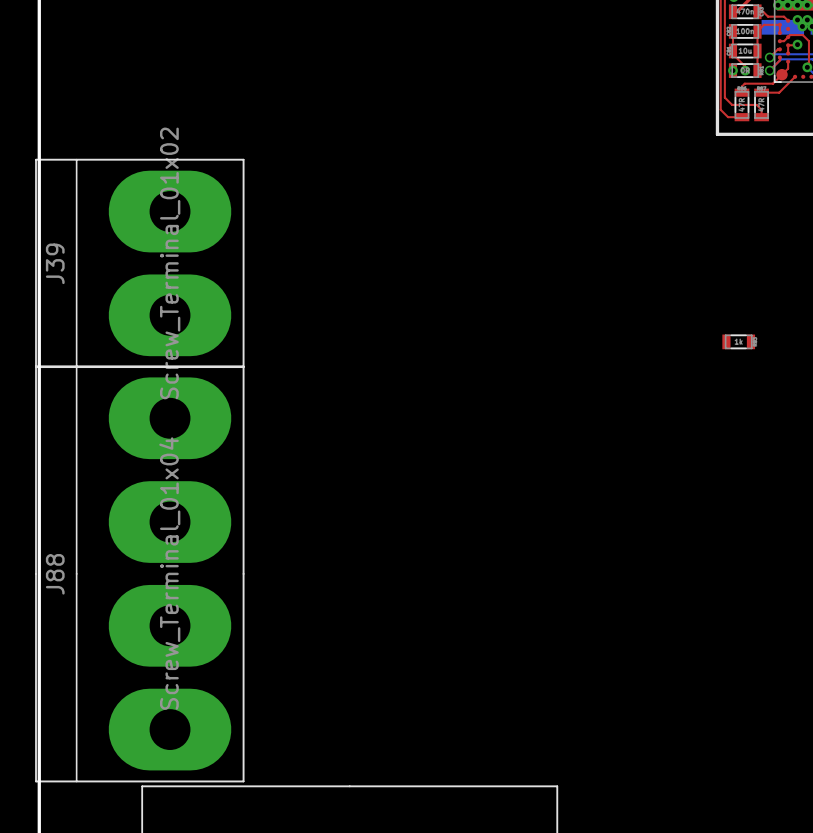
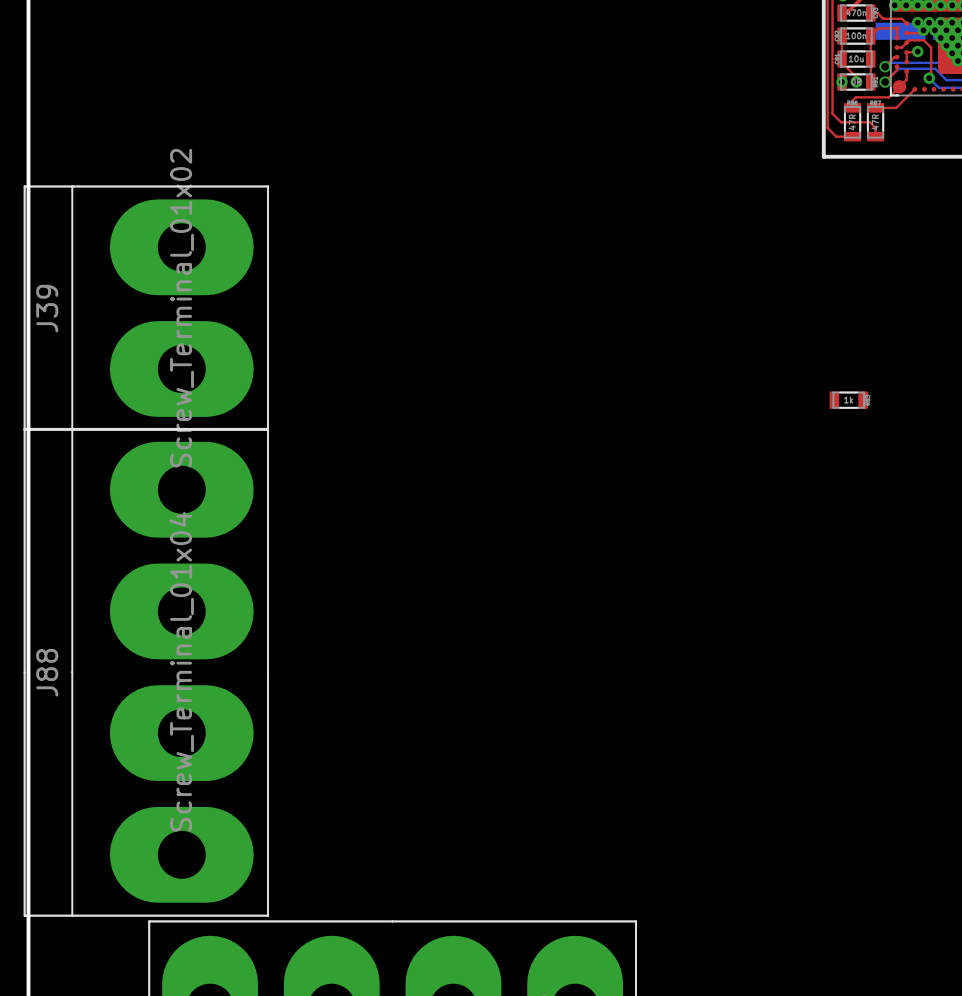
top track: none -> (923, 30) (920, 33) (906, 33)

